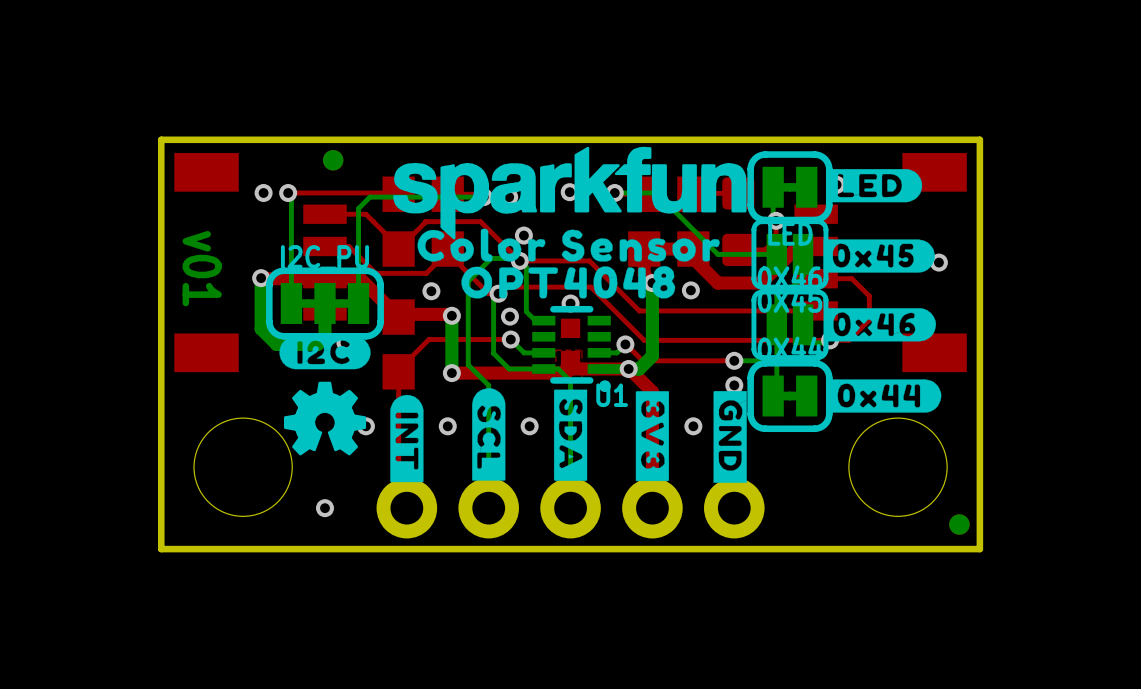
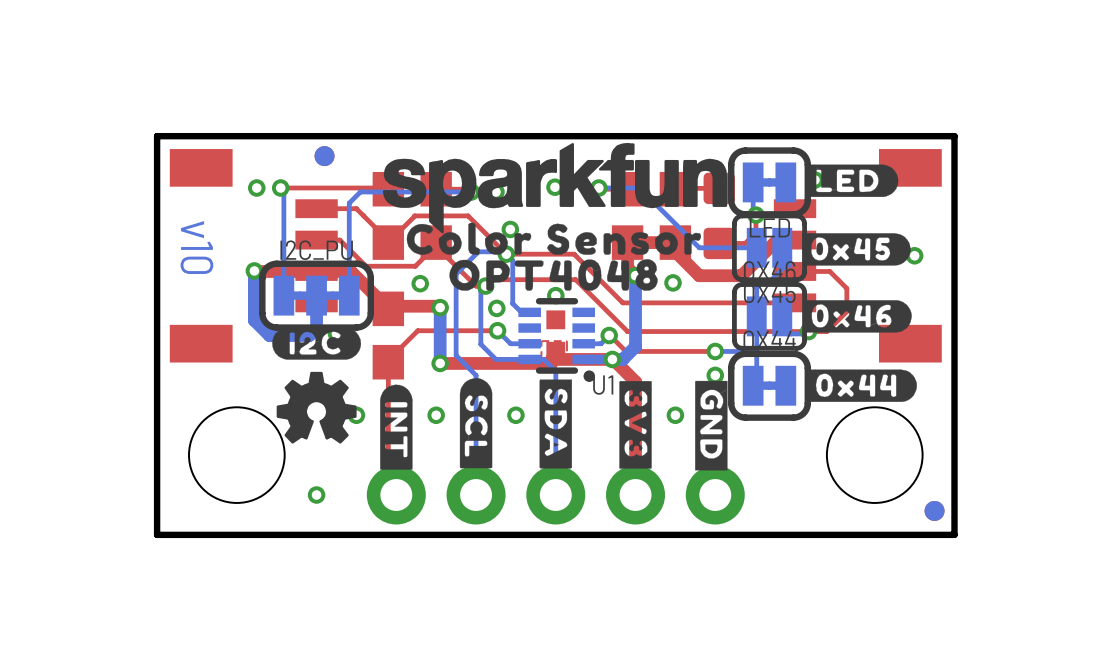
text: v01 (202, 268) -> v10 (196, 247)

